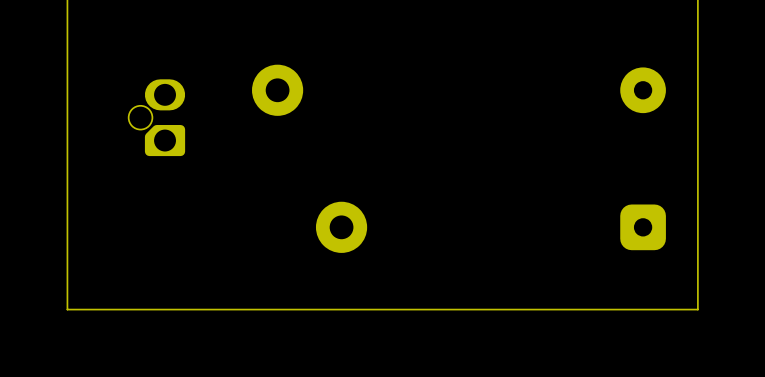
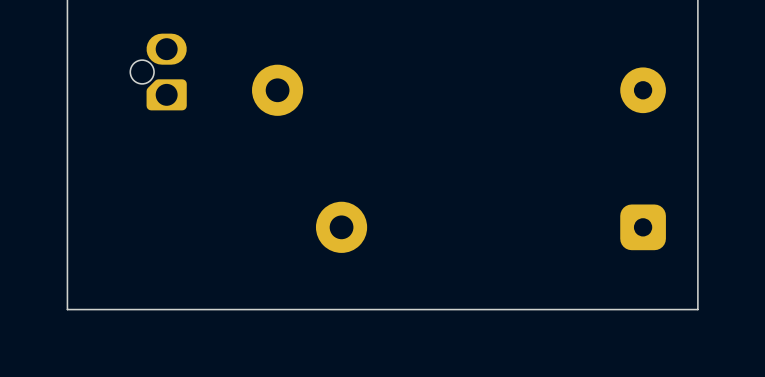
part position: (156, 117) -> (158, 72)

